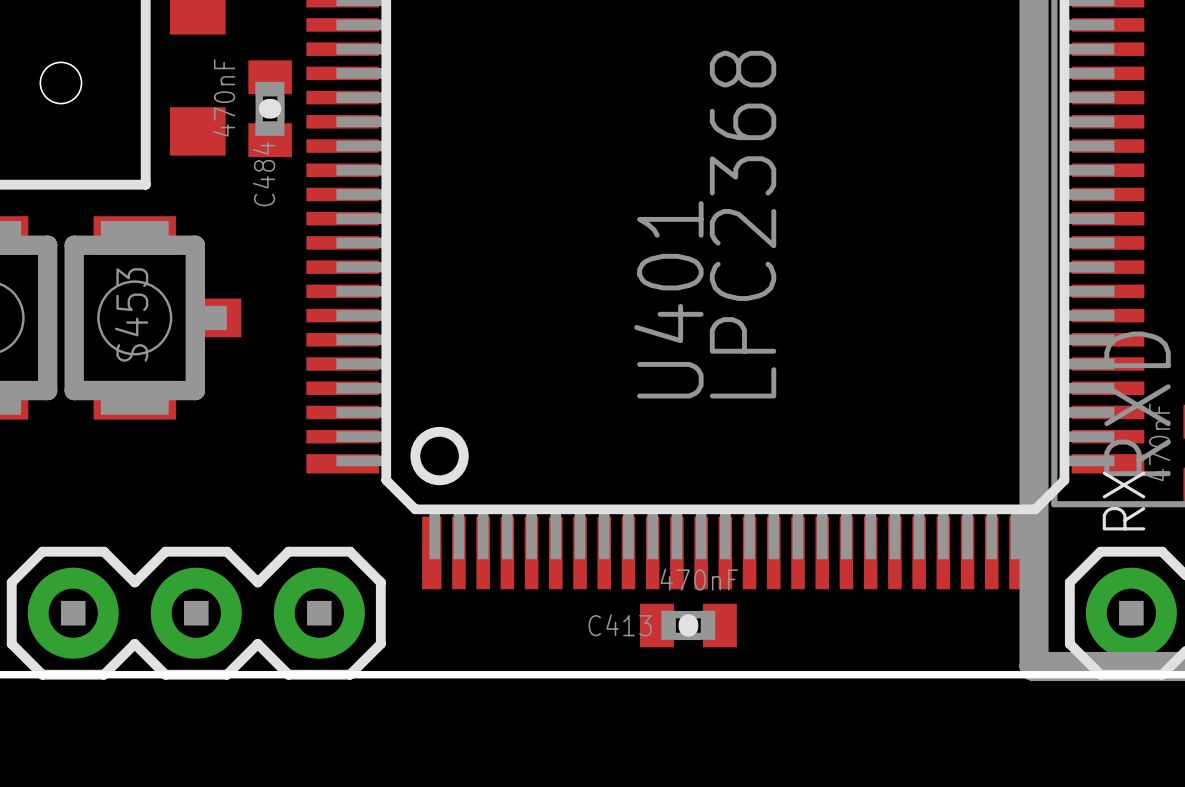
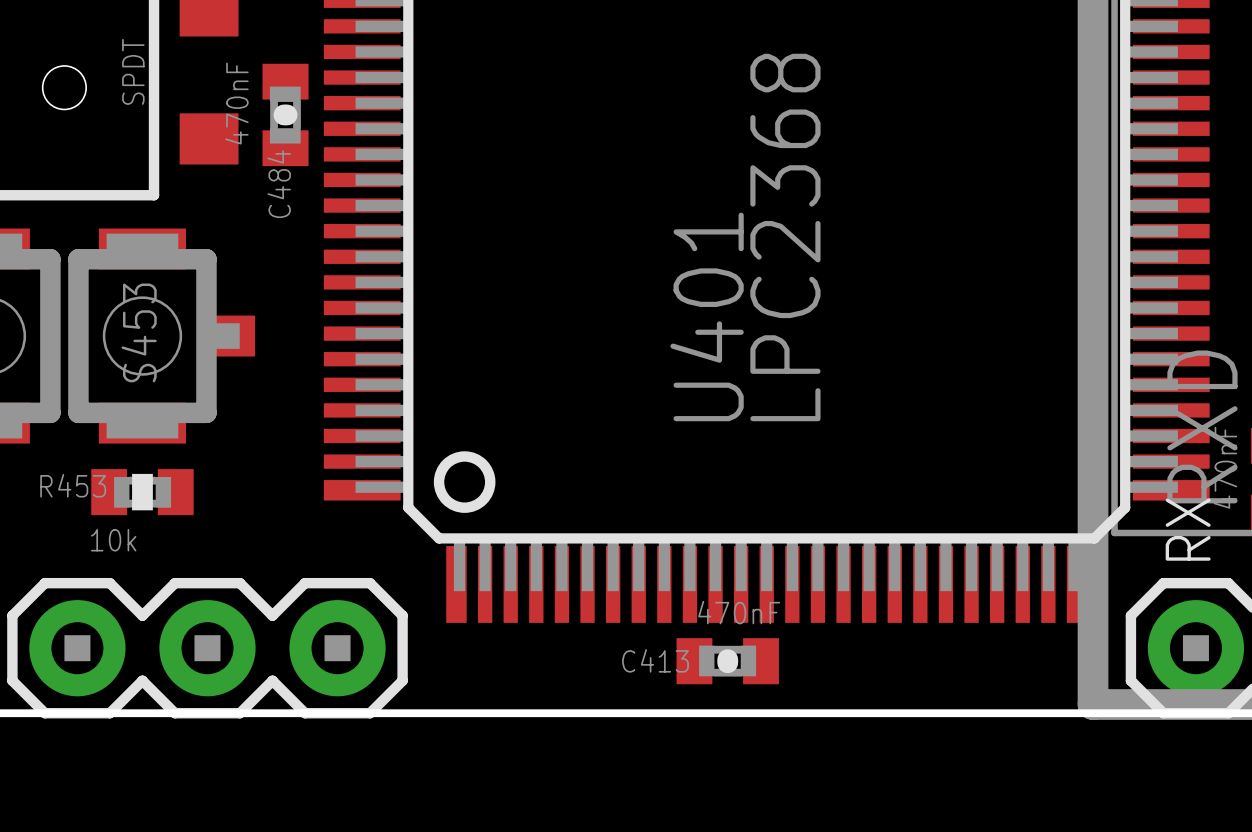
part value: none -> SPDT (133, 71)
R453: none -> 10k (142, 492)

